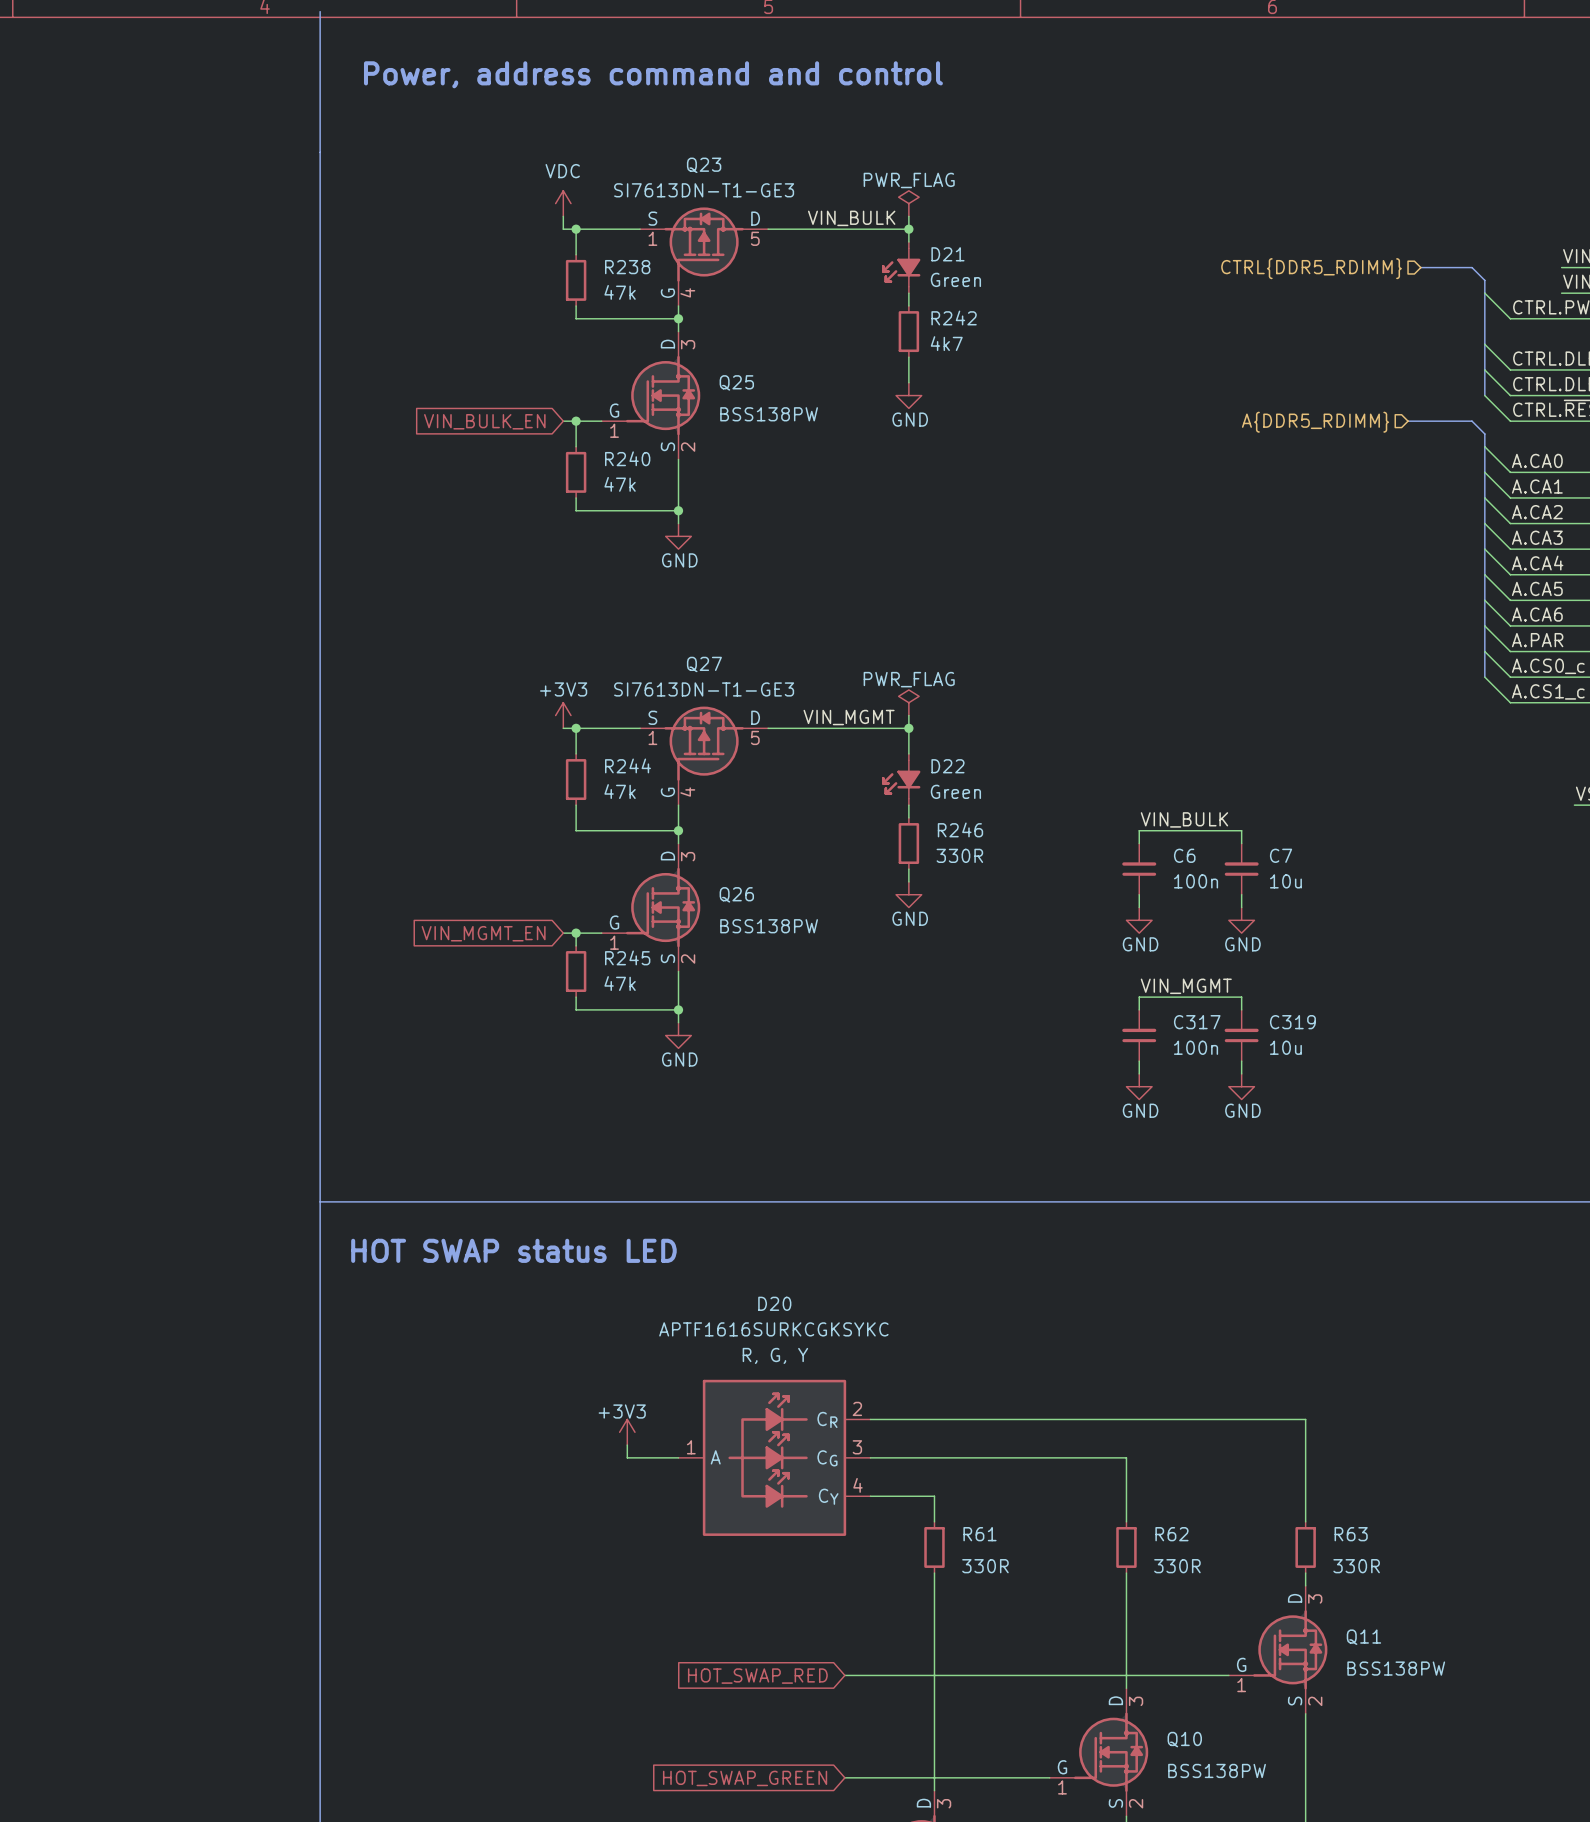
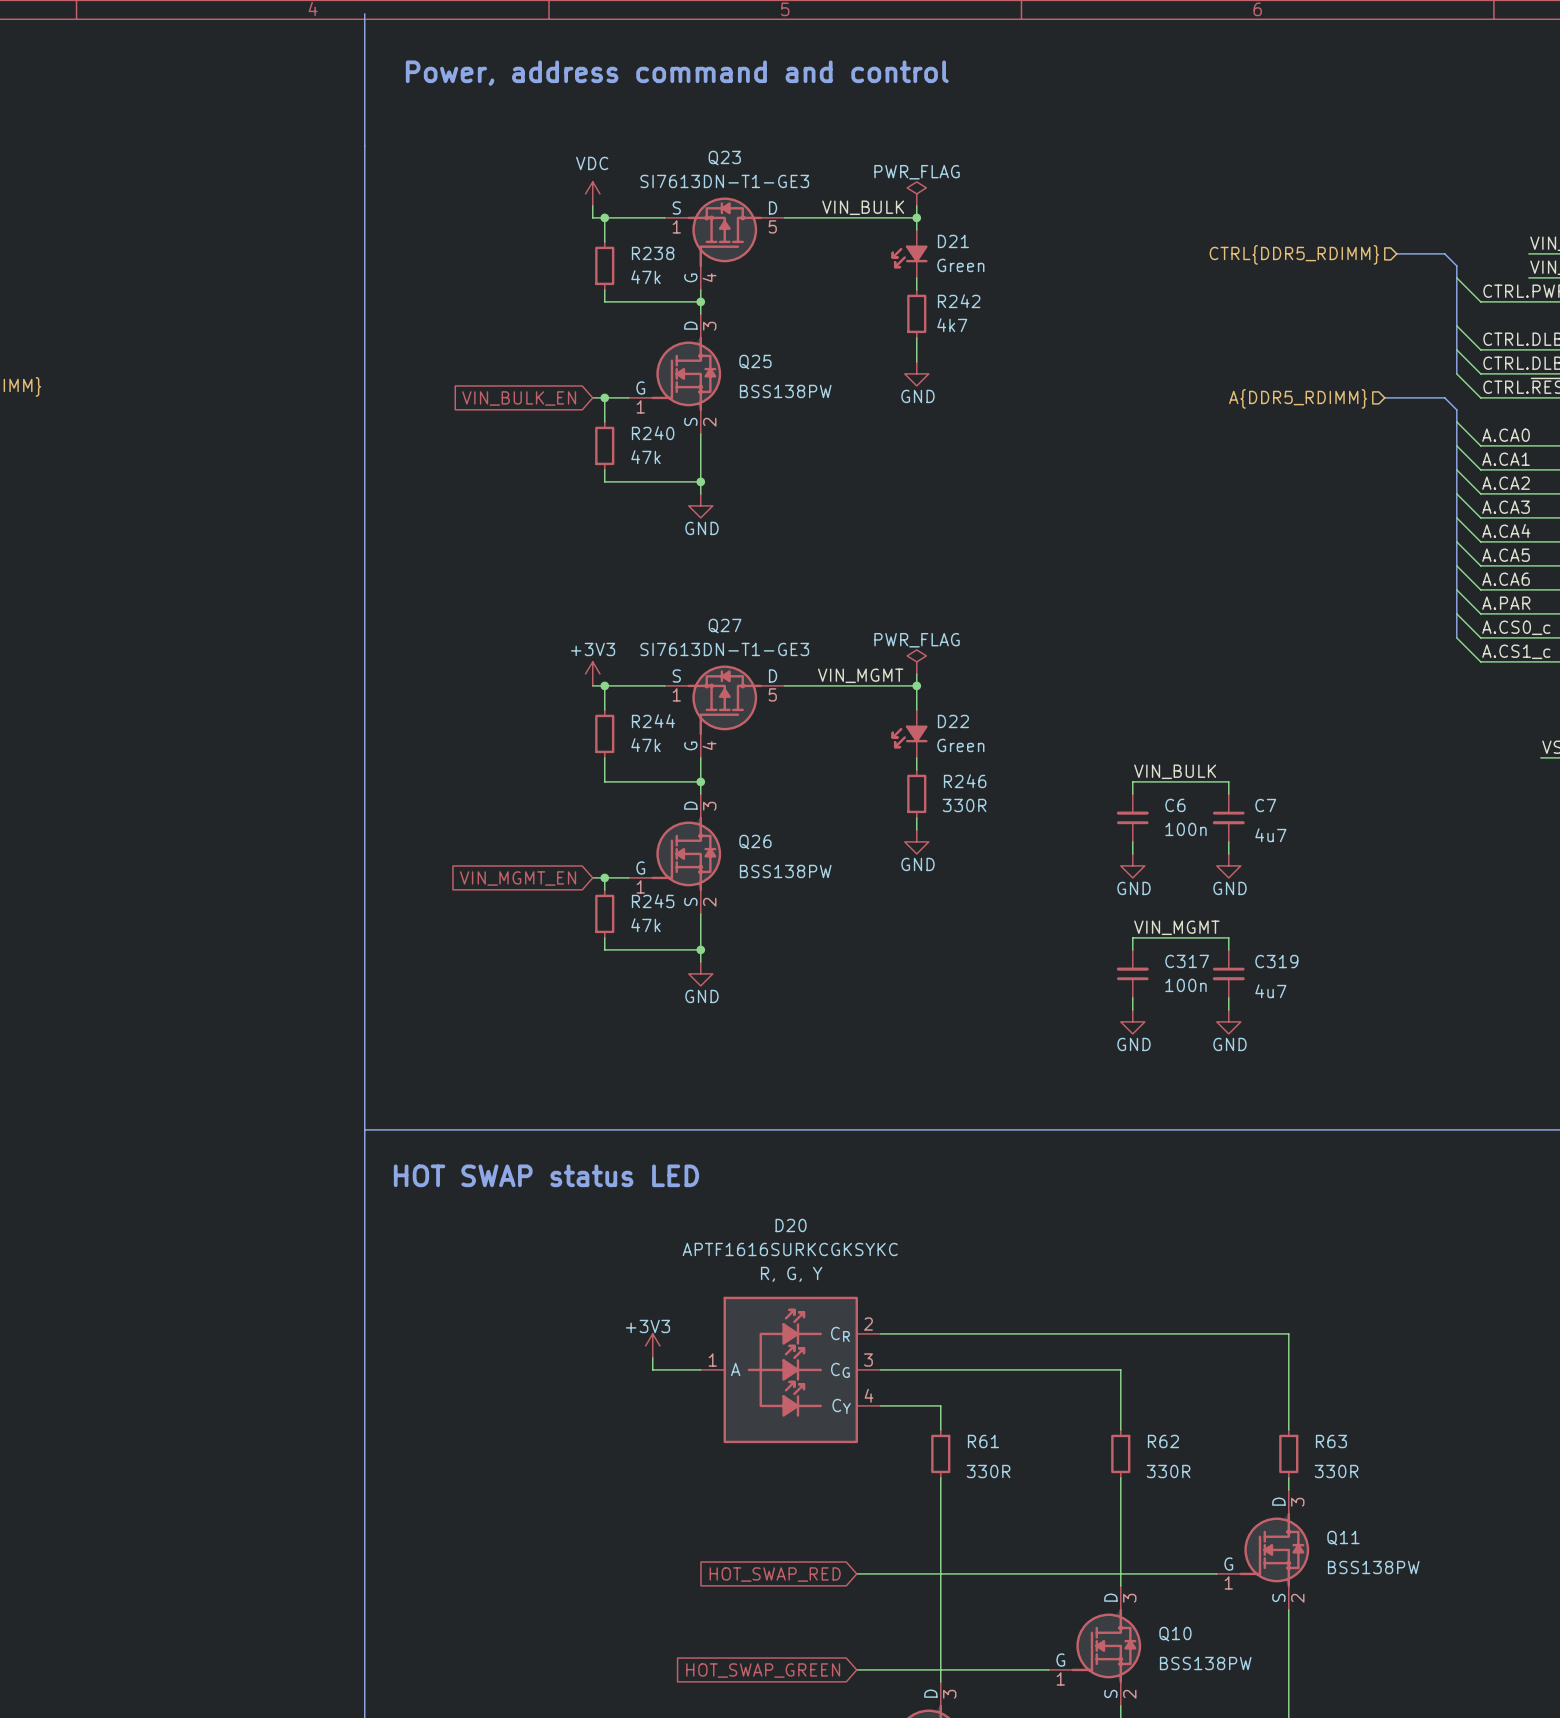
C7 rotation: 0° (1241, 869) -> 180° (1228, 817)
C7 text: 10u (1285, 881) -> 4u7 (1270, 835)
C319 rotation: 0° (1241, 1035) -> 180° (1228, 973)
C319 text: 10u (1285, 1047) -> 4u7 (1270, 991)

